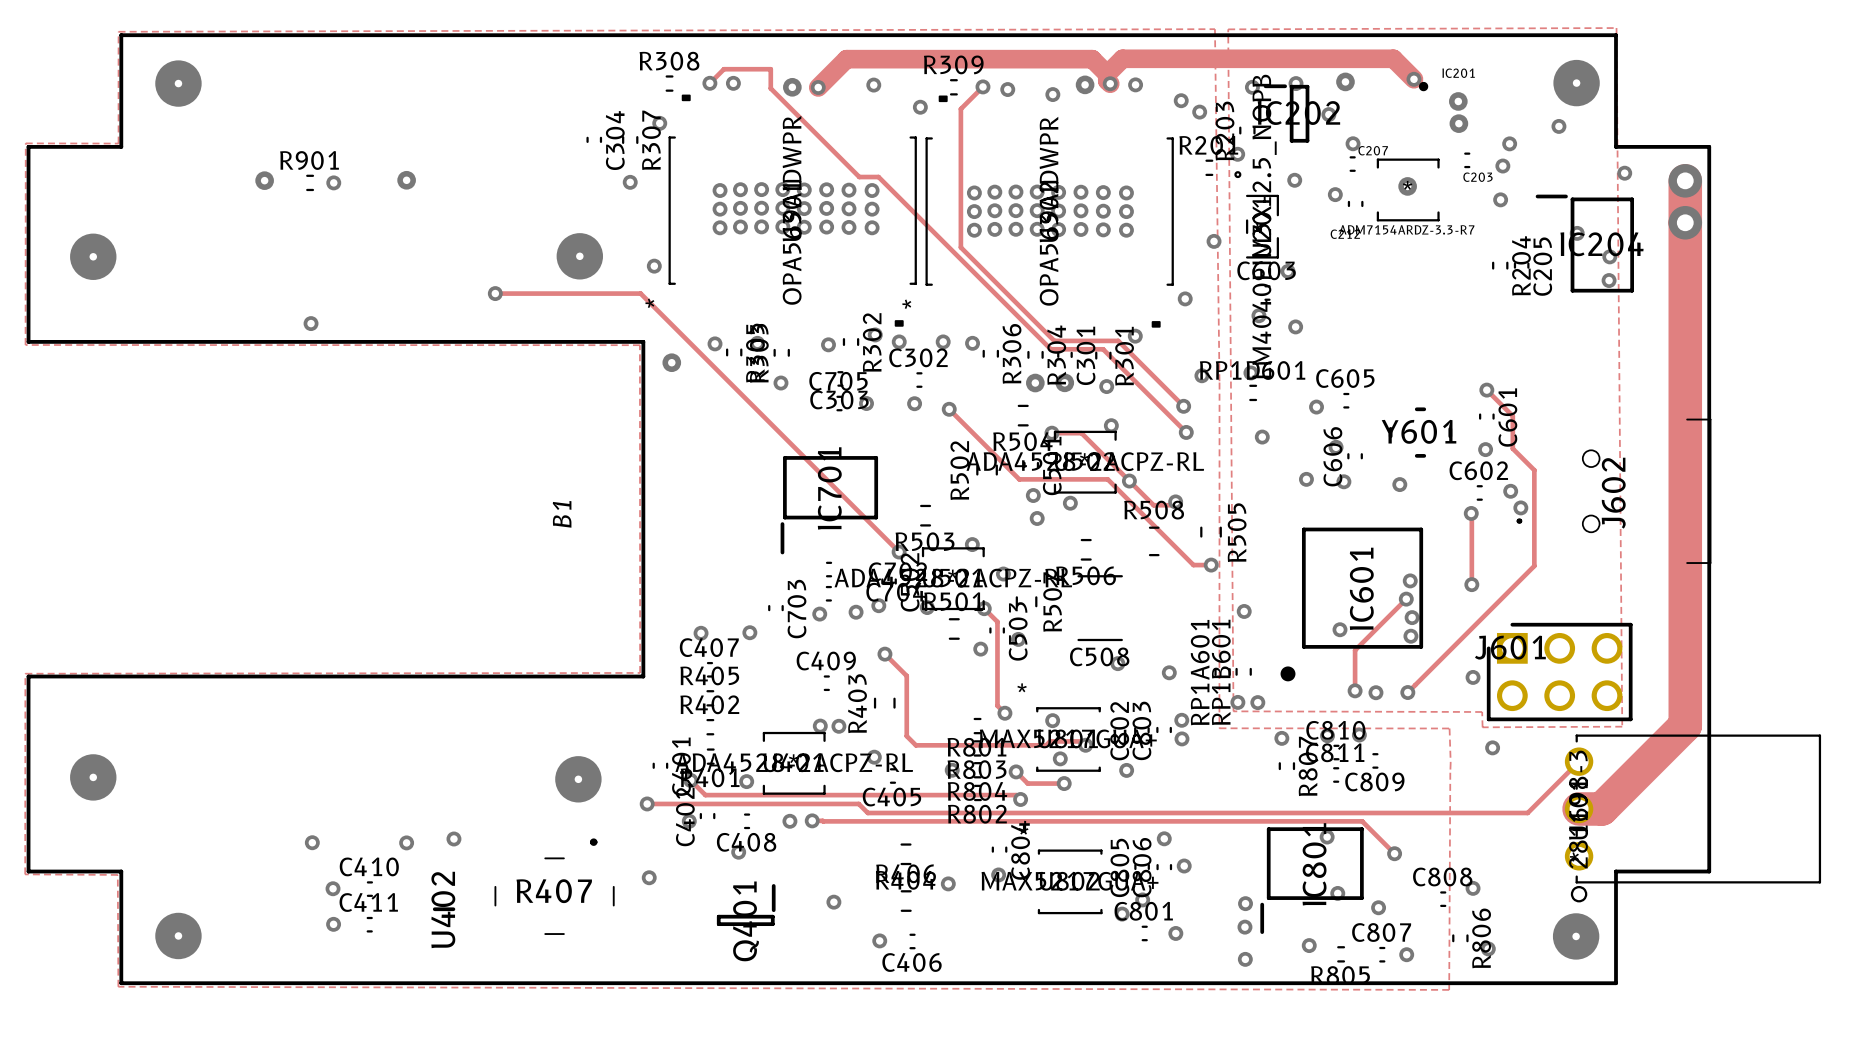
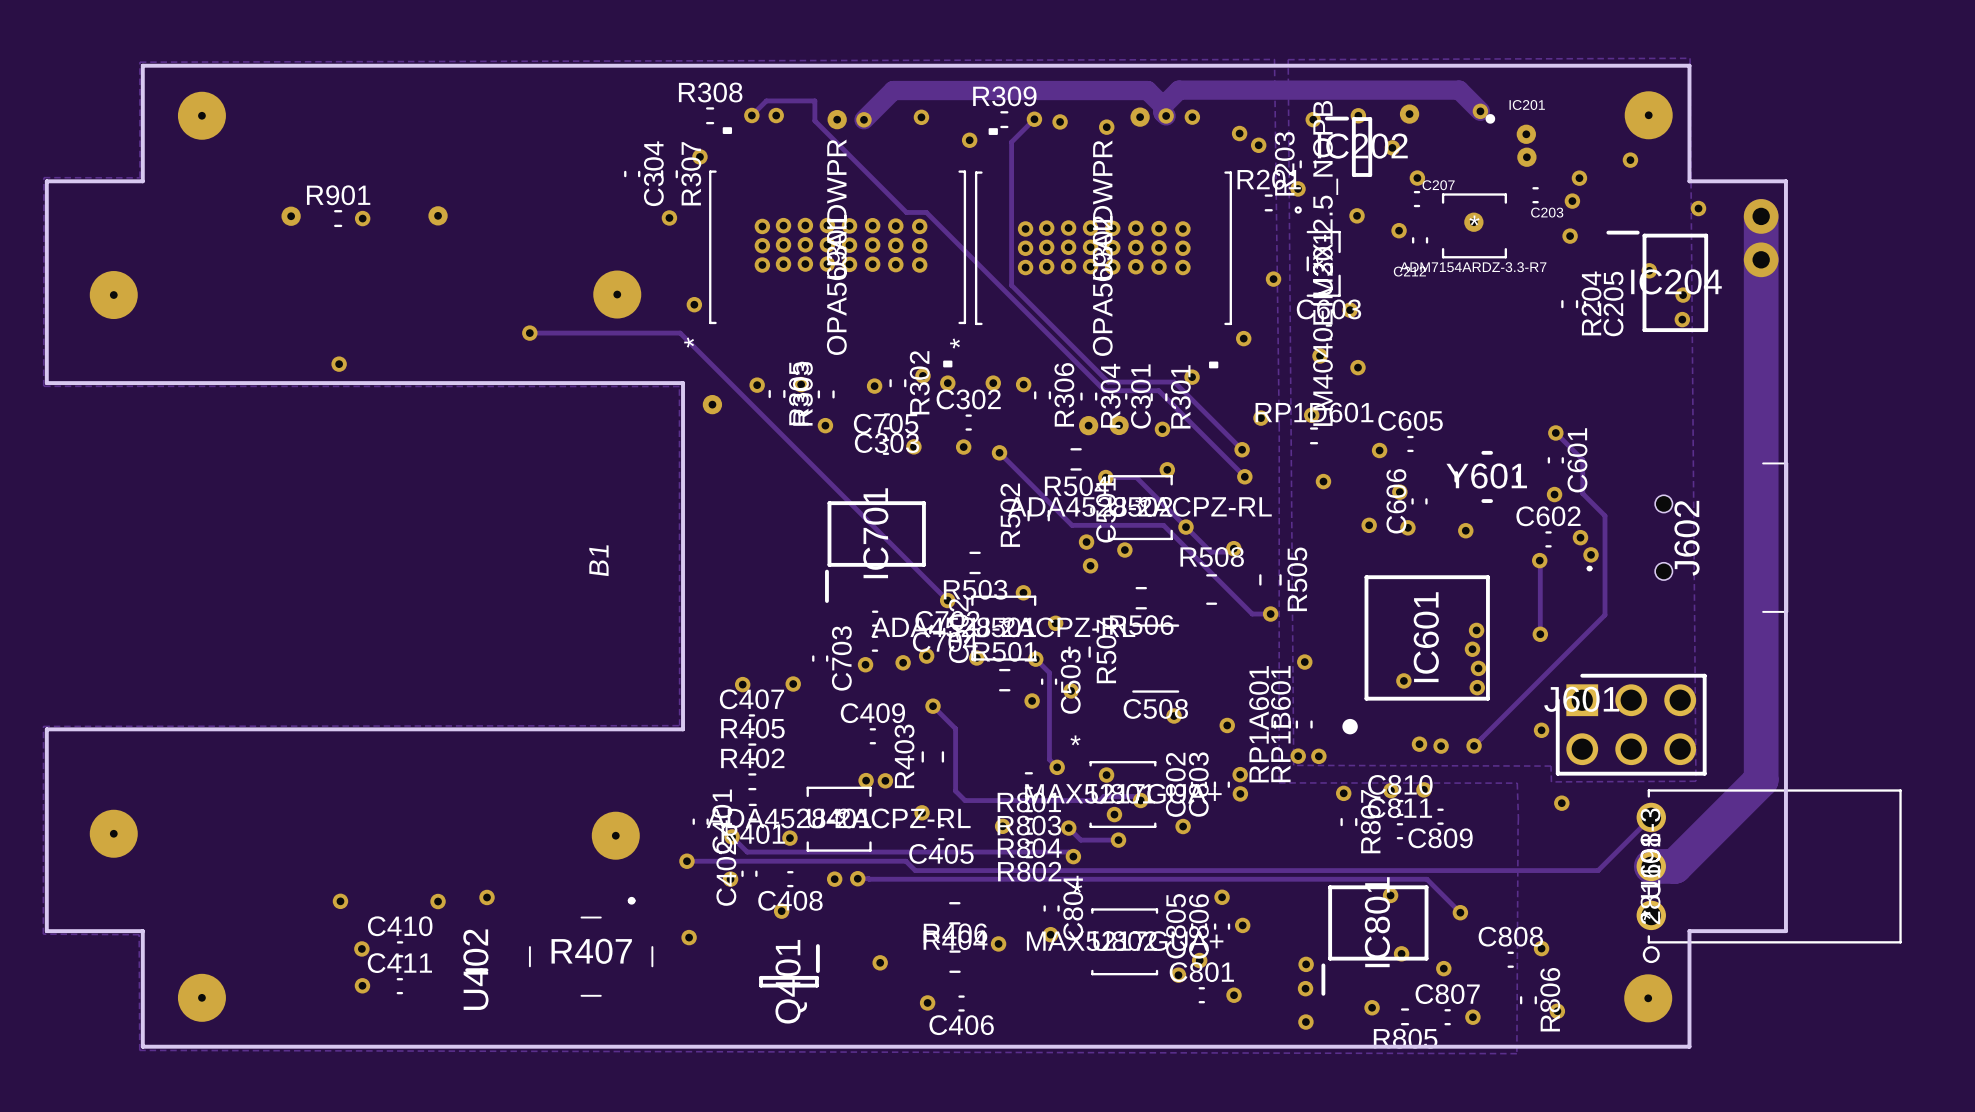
track: (1406, 599) (1355, 650) (1355, 690) -> none

